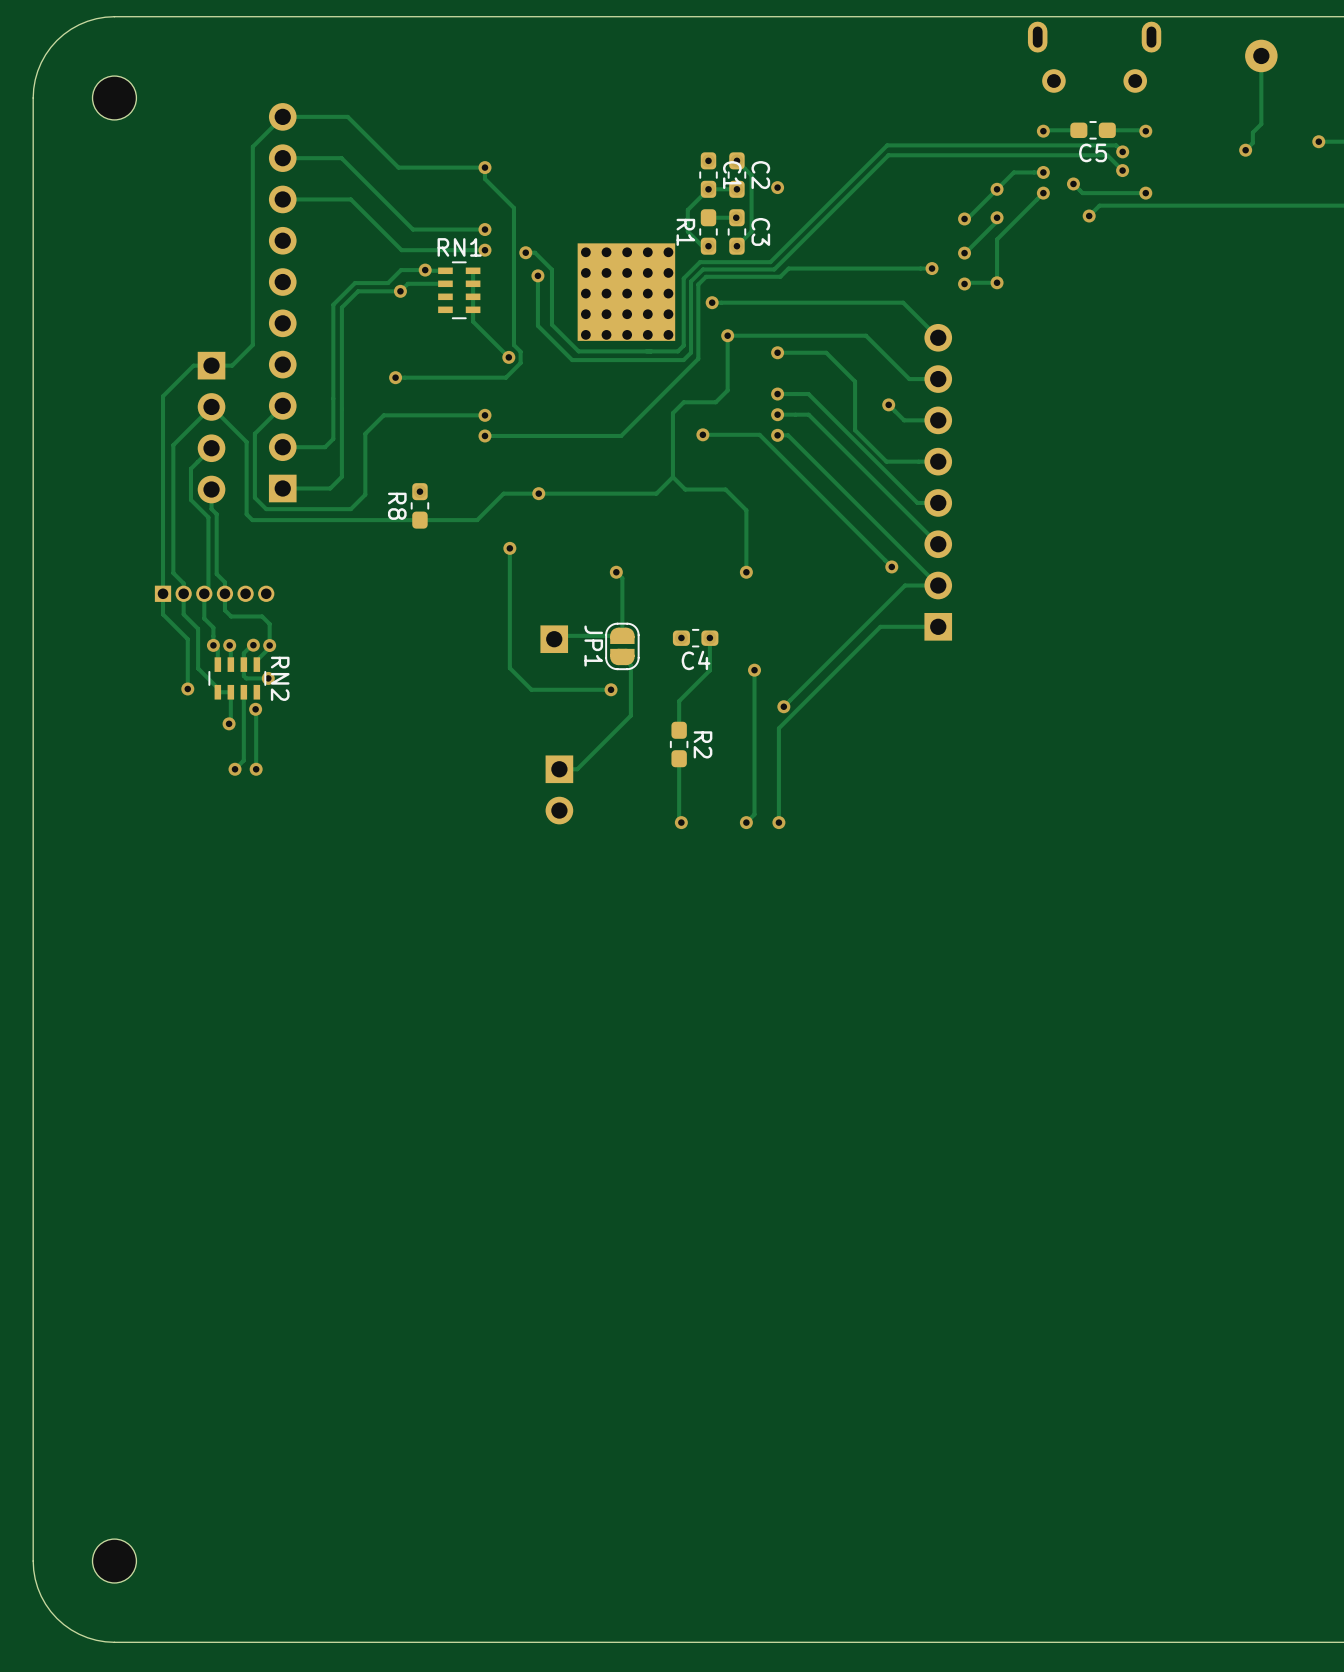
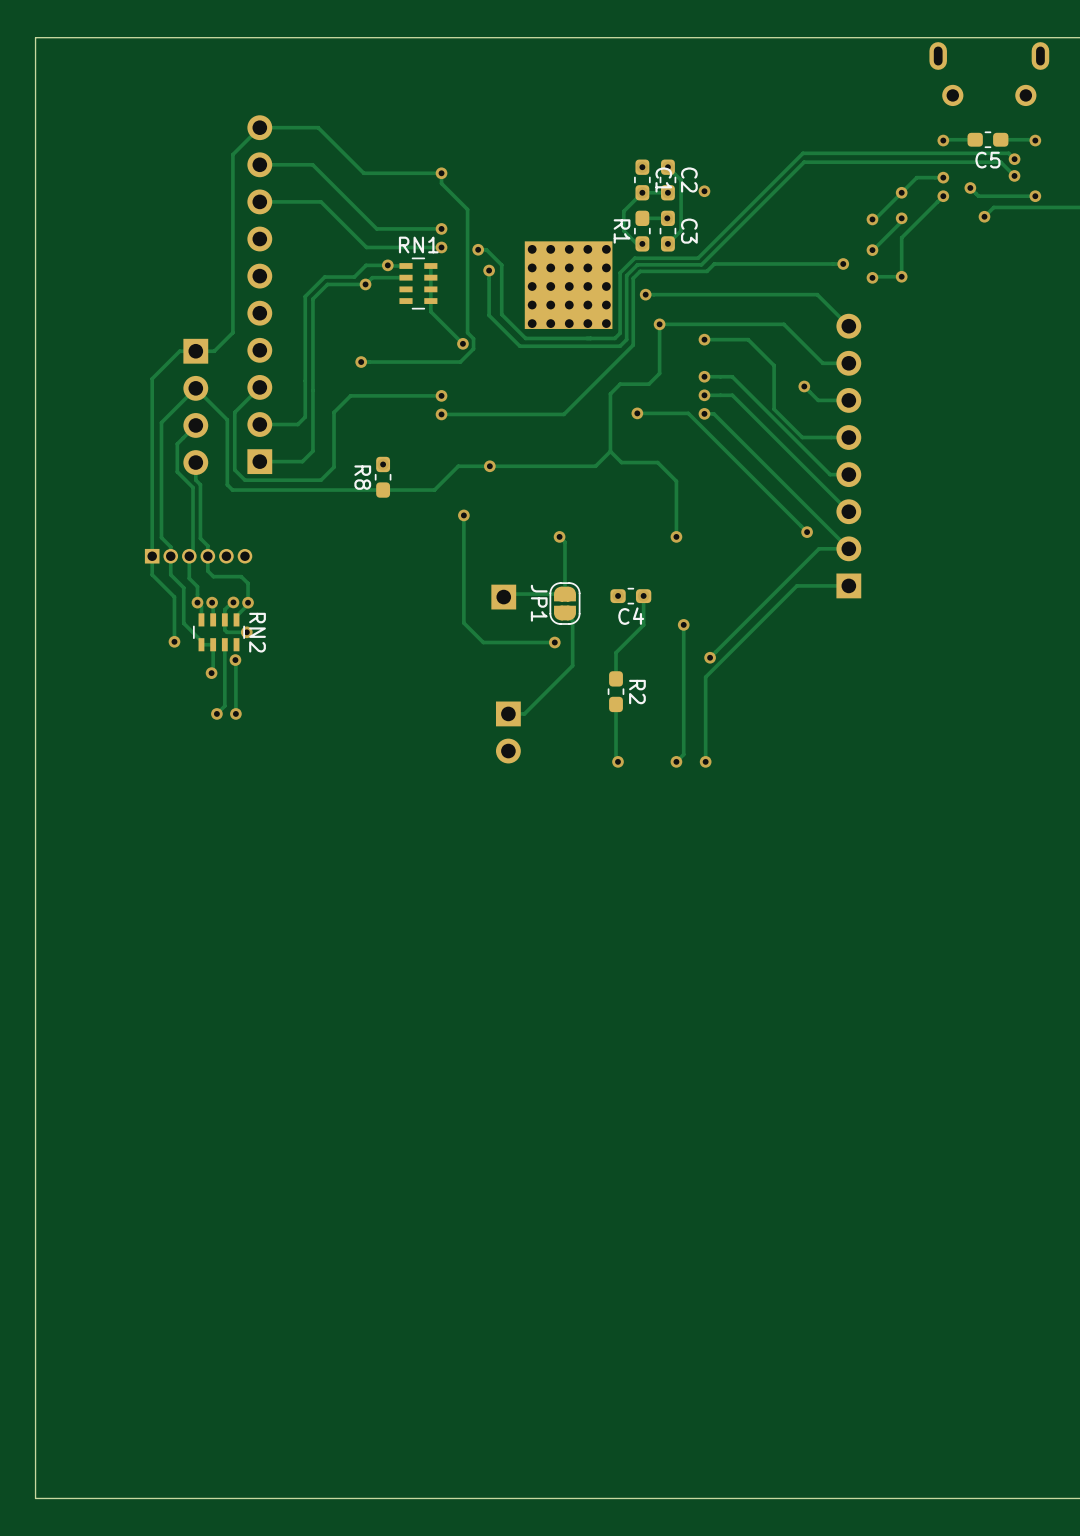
board edge: (114, 16) (96, 18) (79, 24) (57, 40) (45, 54) (37, 71) (33, 97) -> (108, 37) (35, 37) (35, 110)
part: (114, 97) -> none
board edge: (33, 1561) (37, 1587) (45, 1604) (57, 1618) (71, 1629) (87, 1637) (114, 1642) -> (35, 1425) (35, 1498) (108, 1498)
part: (114, 1561) -> none

